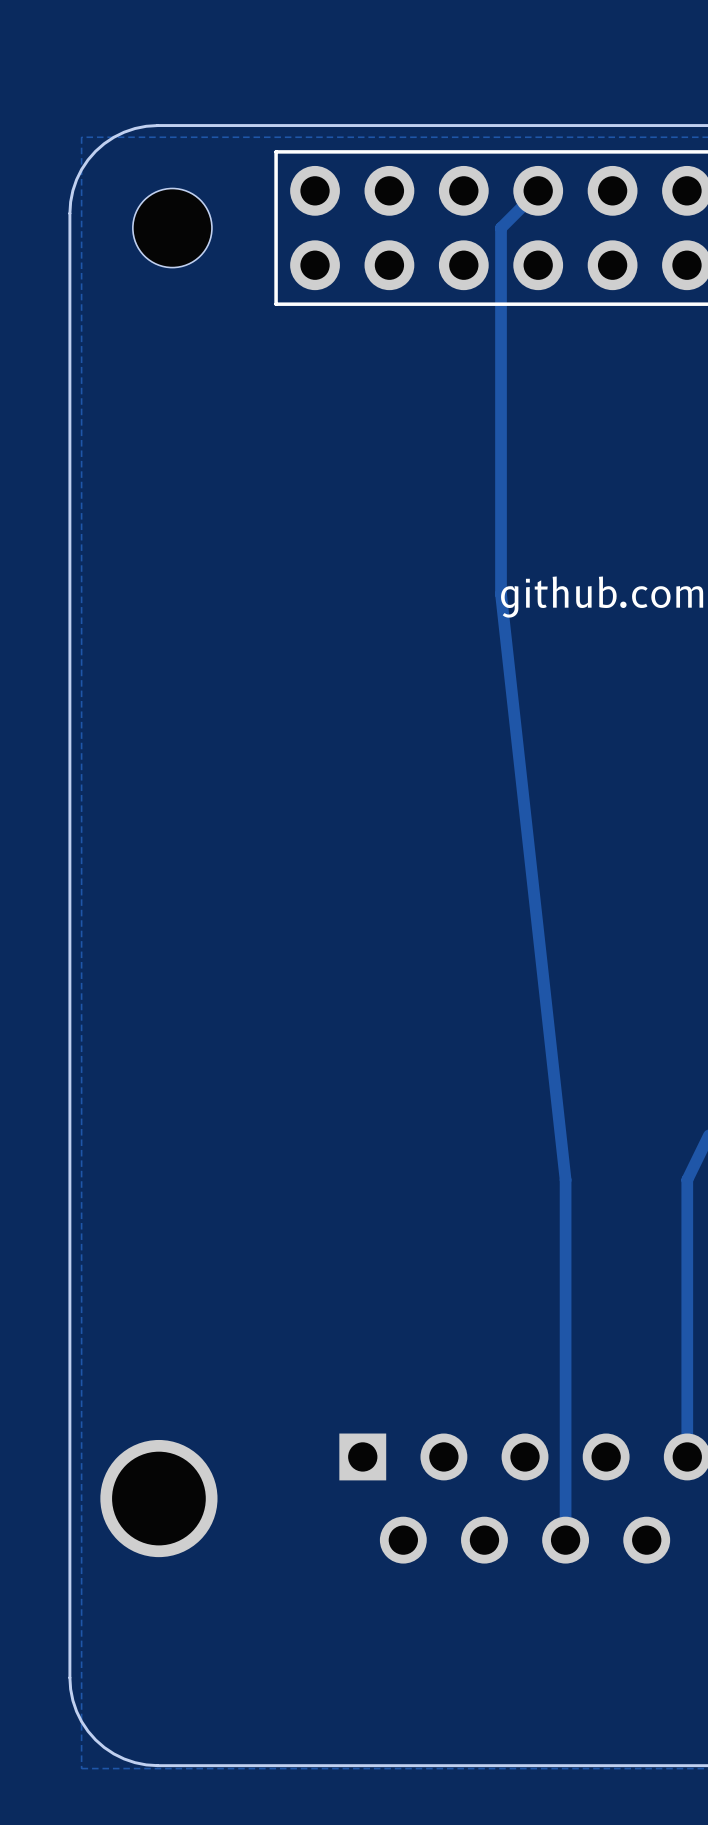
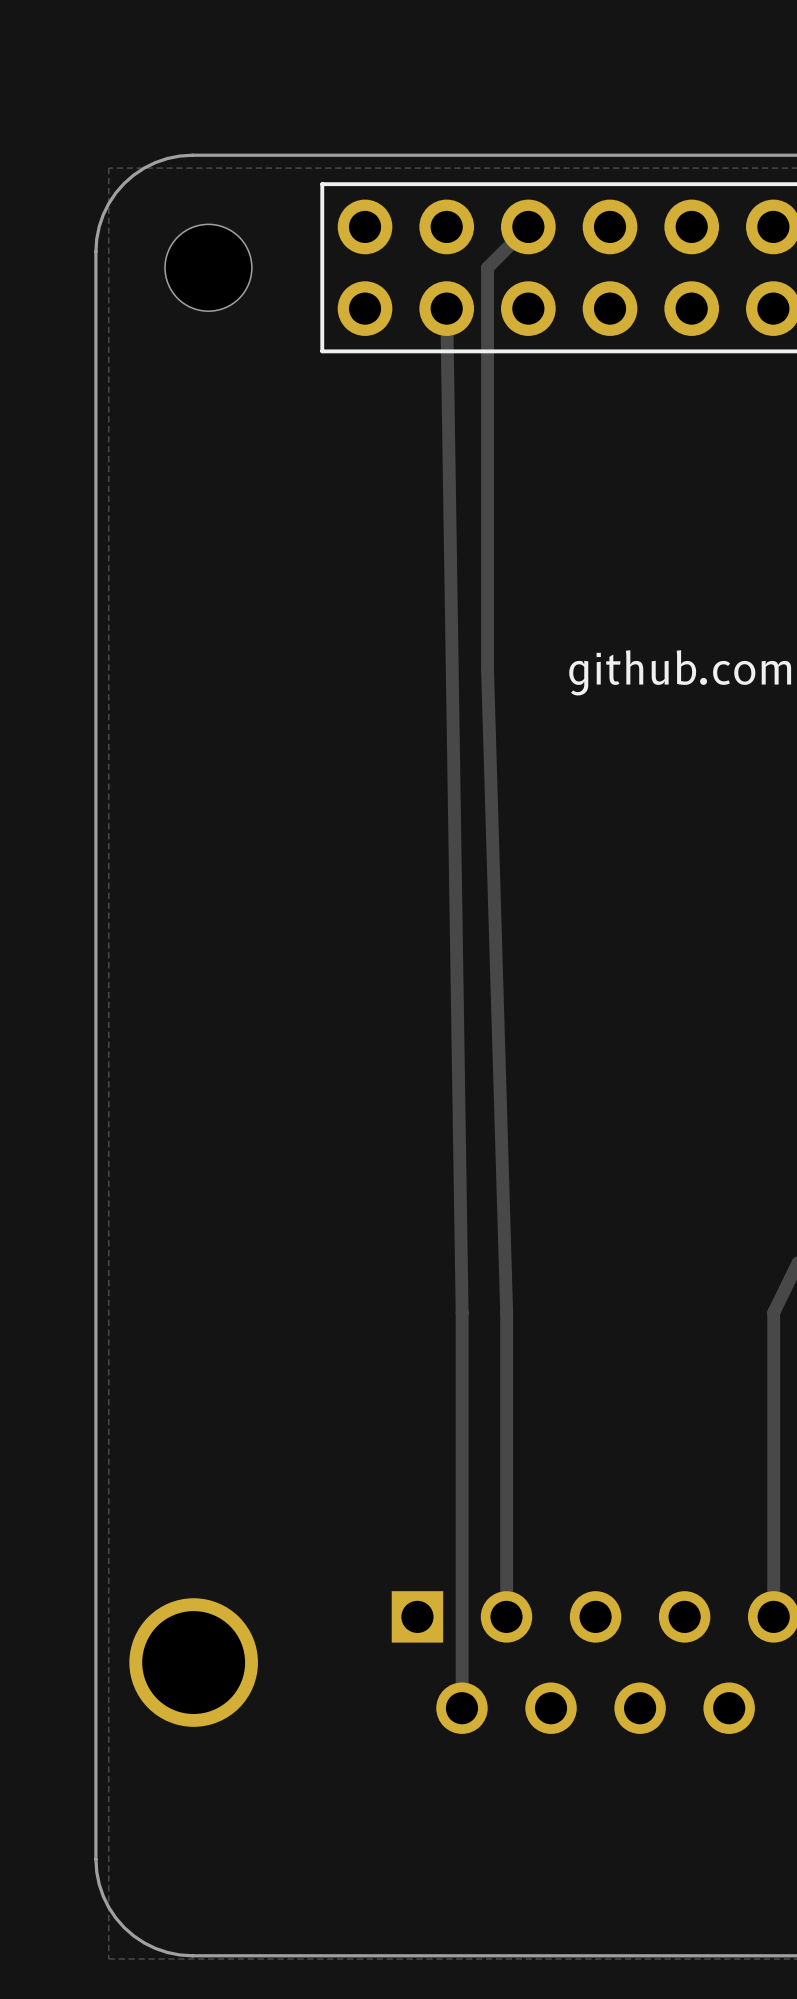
track: none -> (528, 226) (487, 267) (487, 669) (506, 1312) (506, 1616)
track: (538, 190) (501, 228) (501, 594) (565, 1179) (565, 1540) -> none
track: none -> (446, 308) (462, 1312) (462, 1708)

